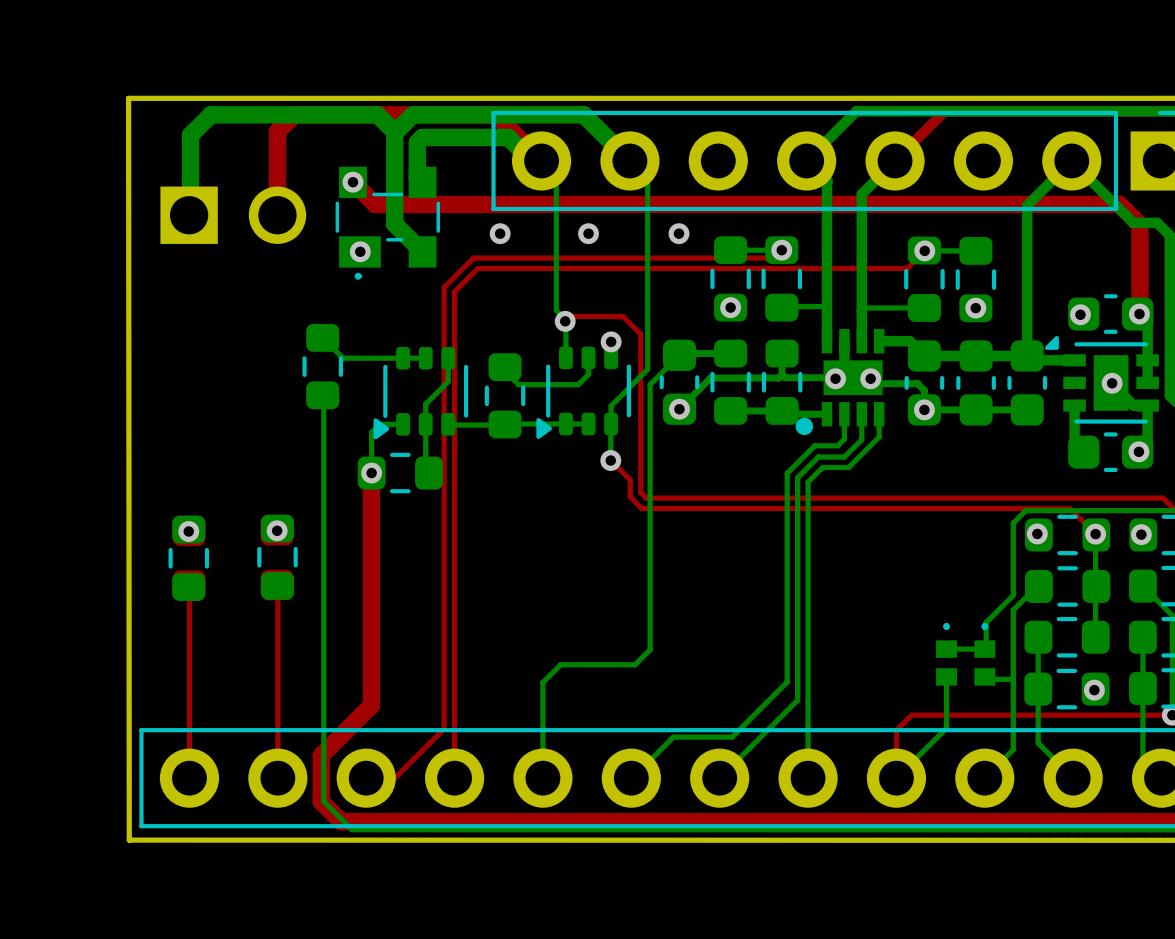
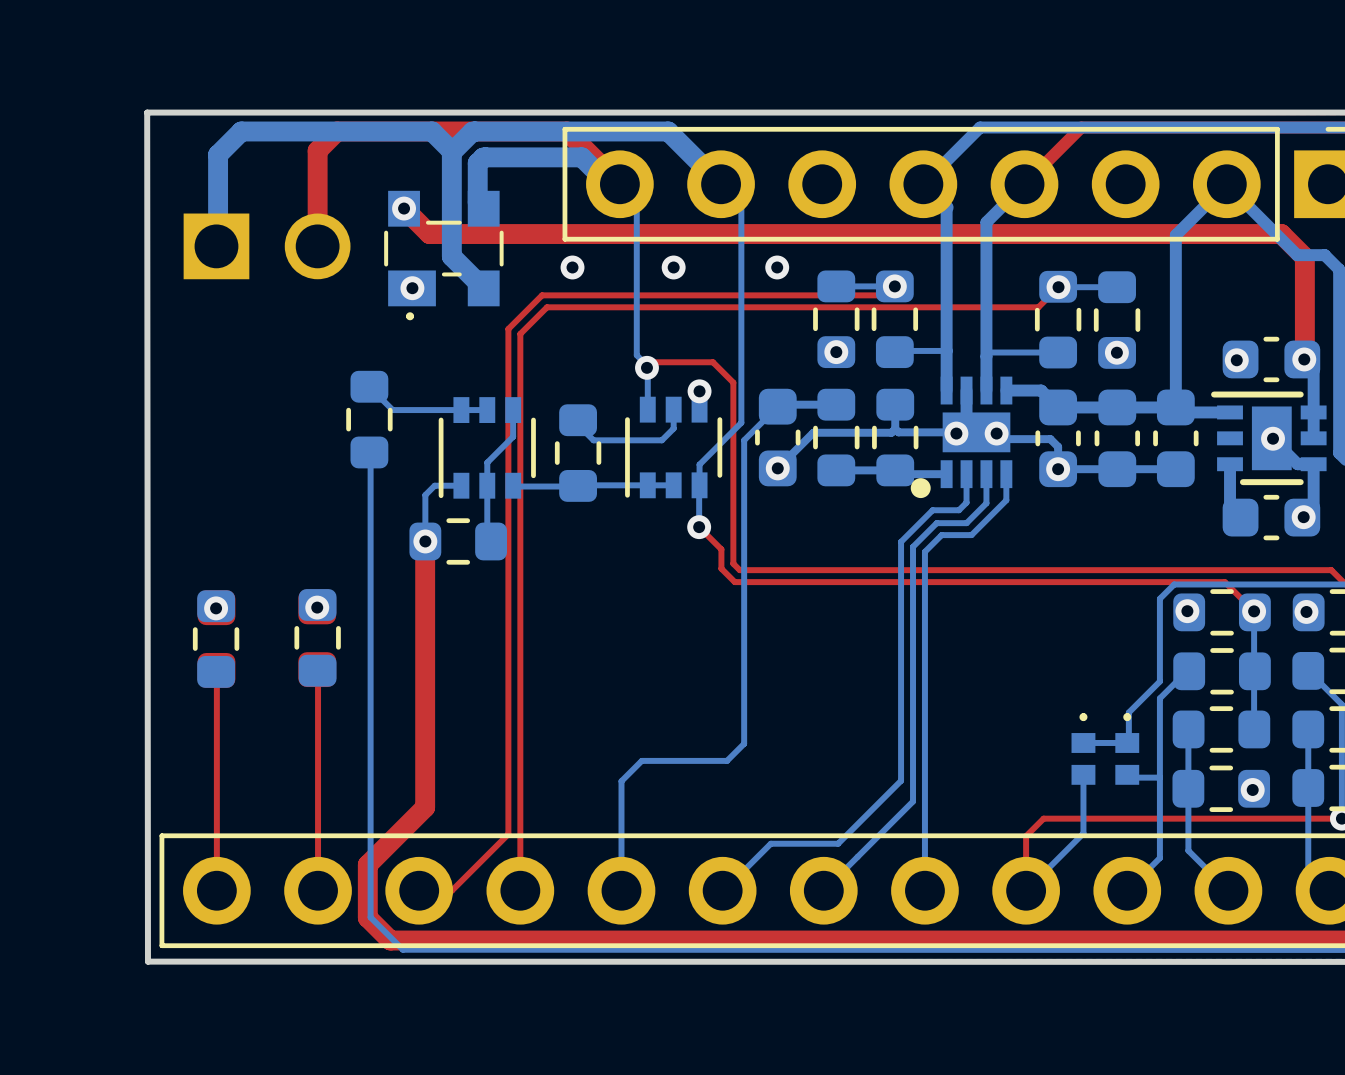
part footprint: [1045, 335, 1159, 424] -> [1211, 391, 1327, 486]
part footprint: [373, 346, 469, 440] -> [438, 397, 536, 499]
part footprint: [536, 346, 631, 439] -> [625, 396, 723, 499]

